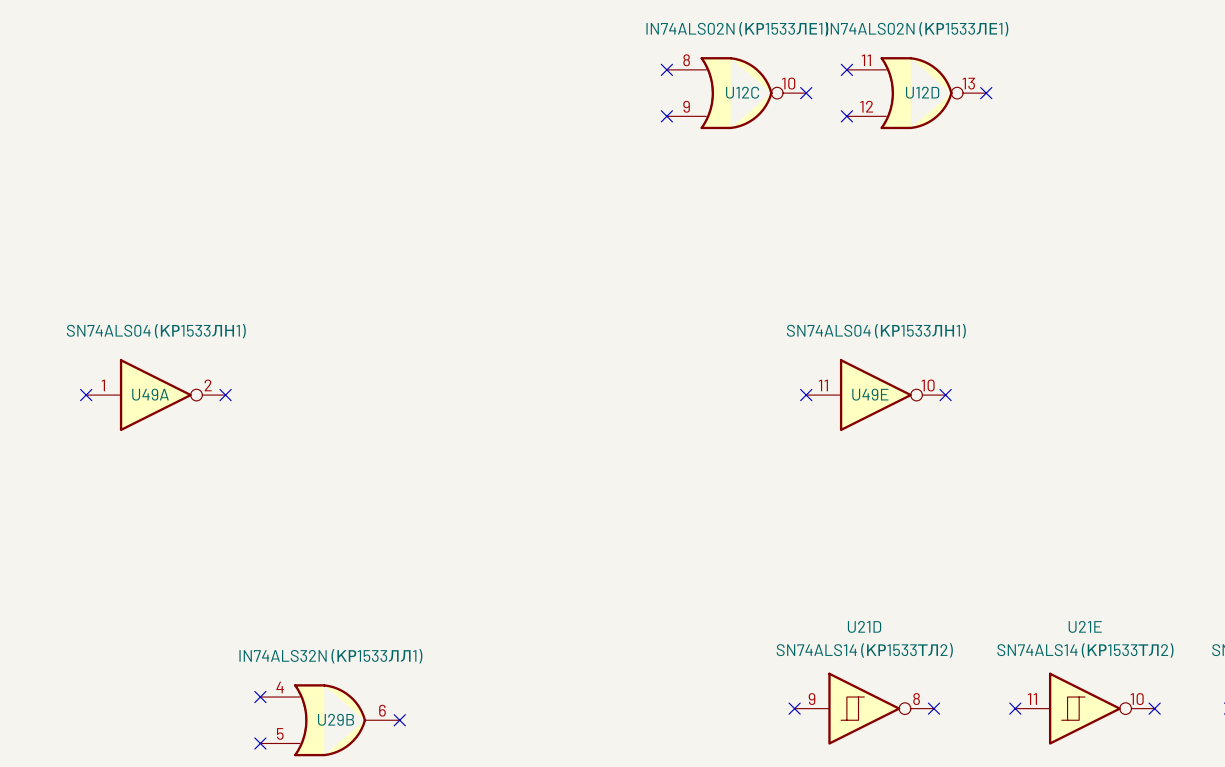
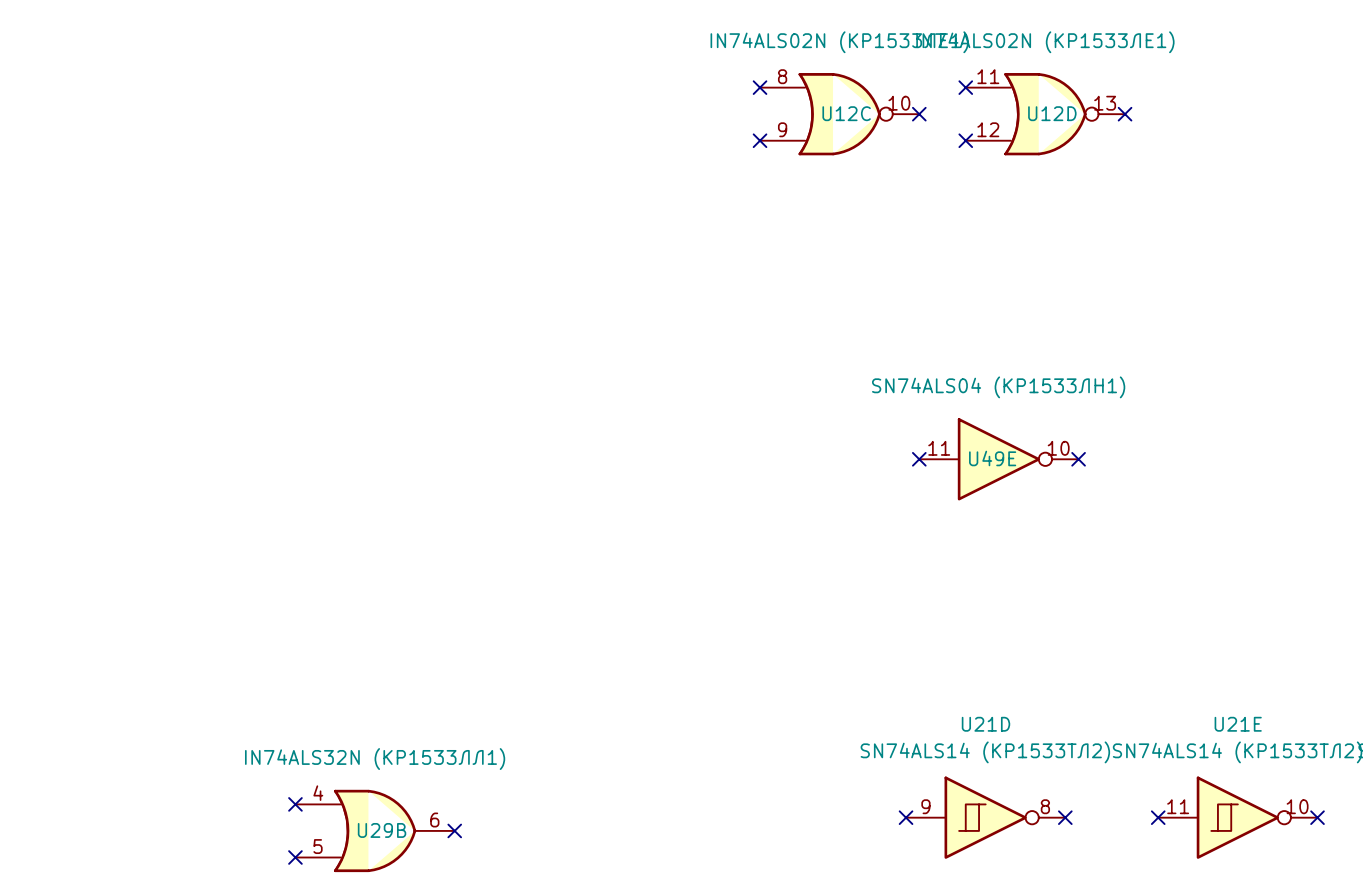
no-connect mark: (86, 395) -> none
U49A: SN74ALS04 (КР1533ЛН1) (155, 395) -> none
no-connect mark: (225, 395) -> none

